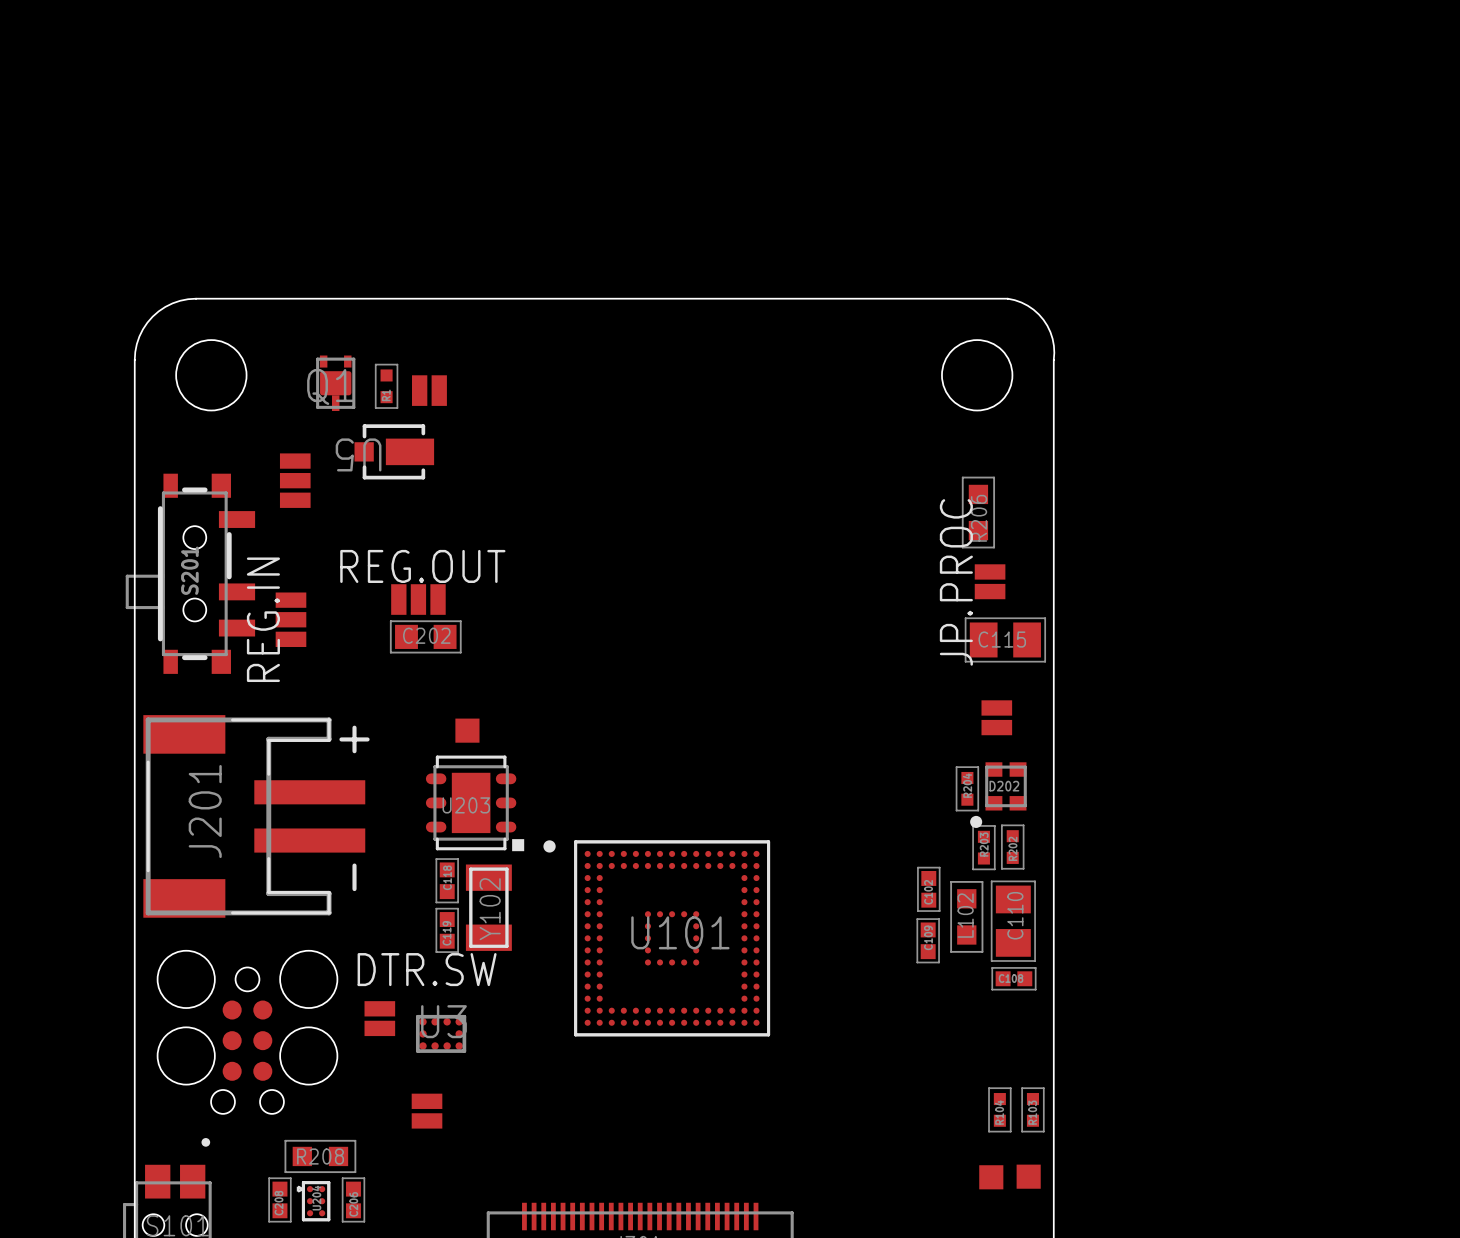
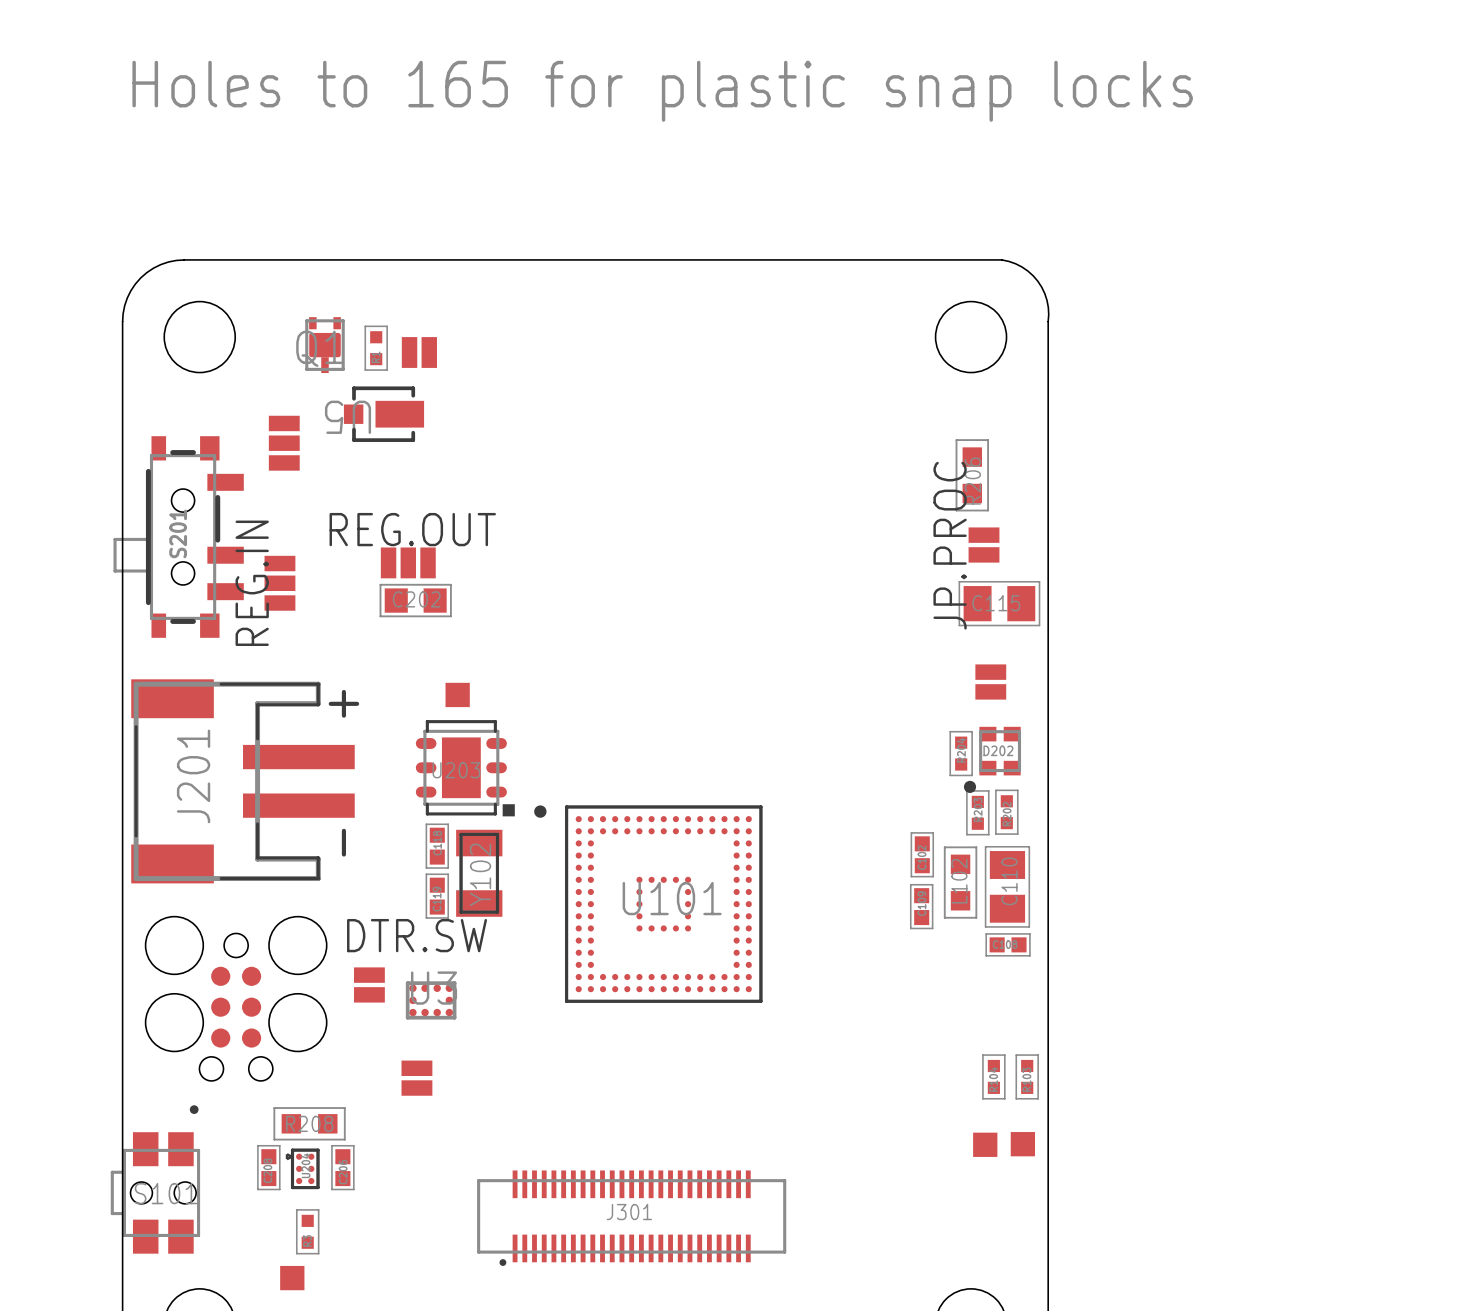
text: none -> Holes to 165 for plastic snap locks (662, 91)

